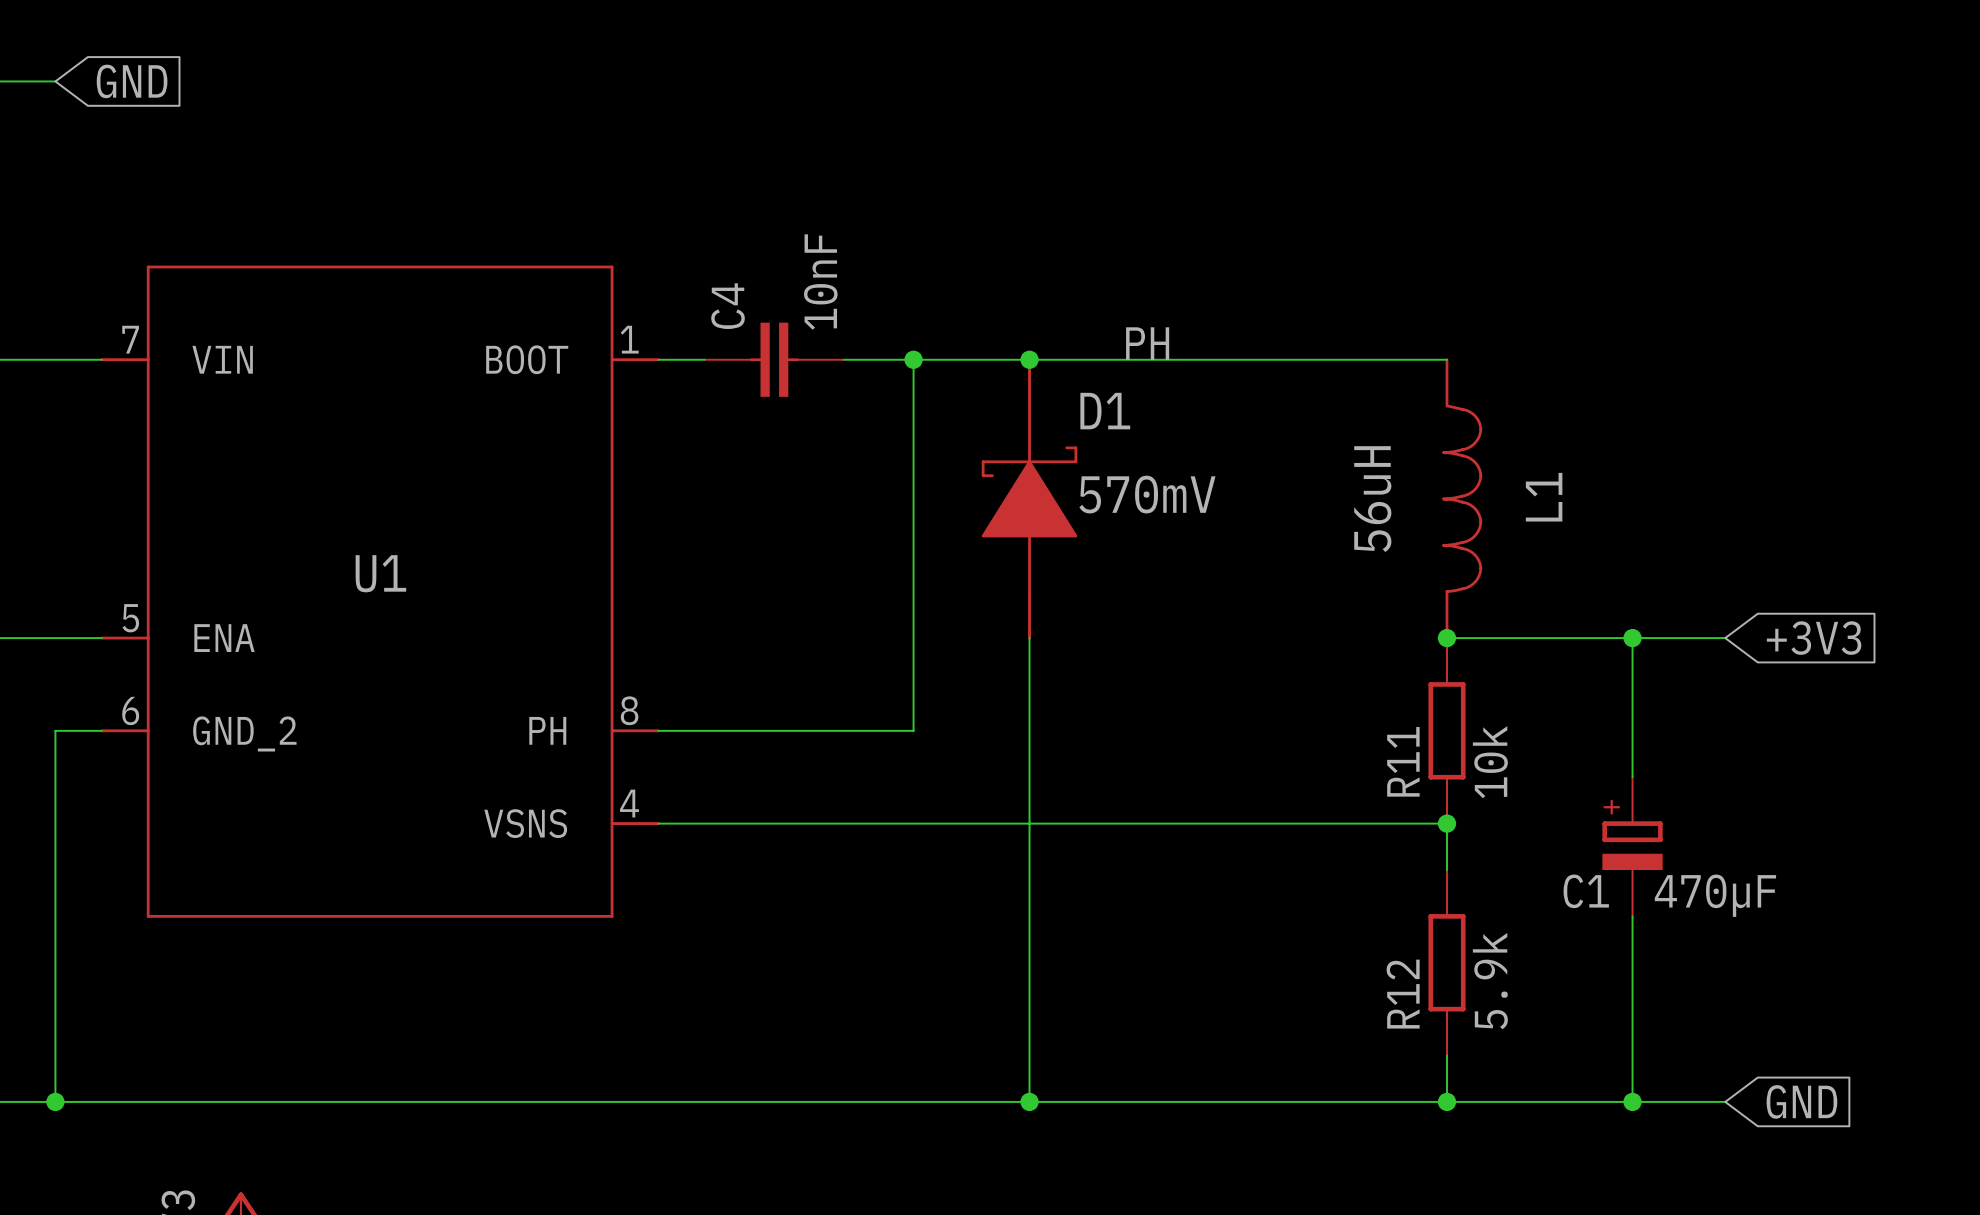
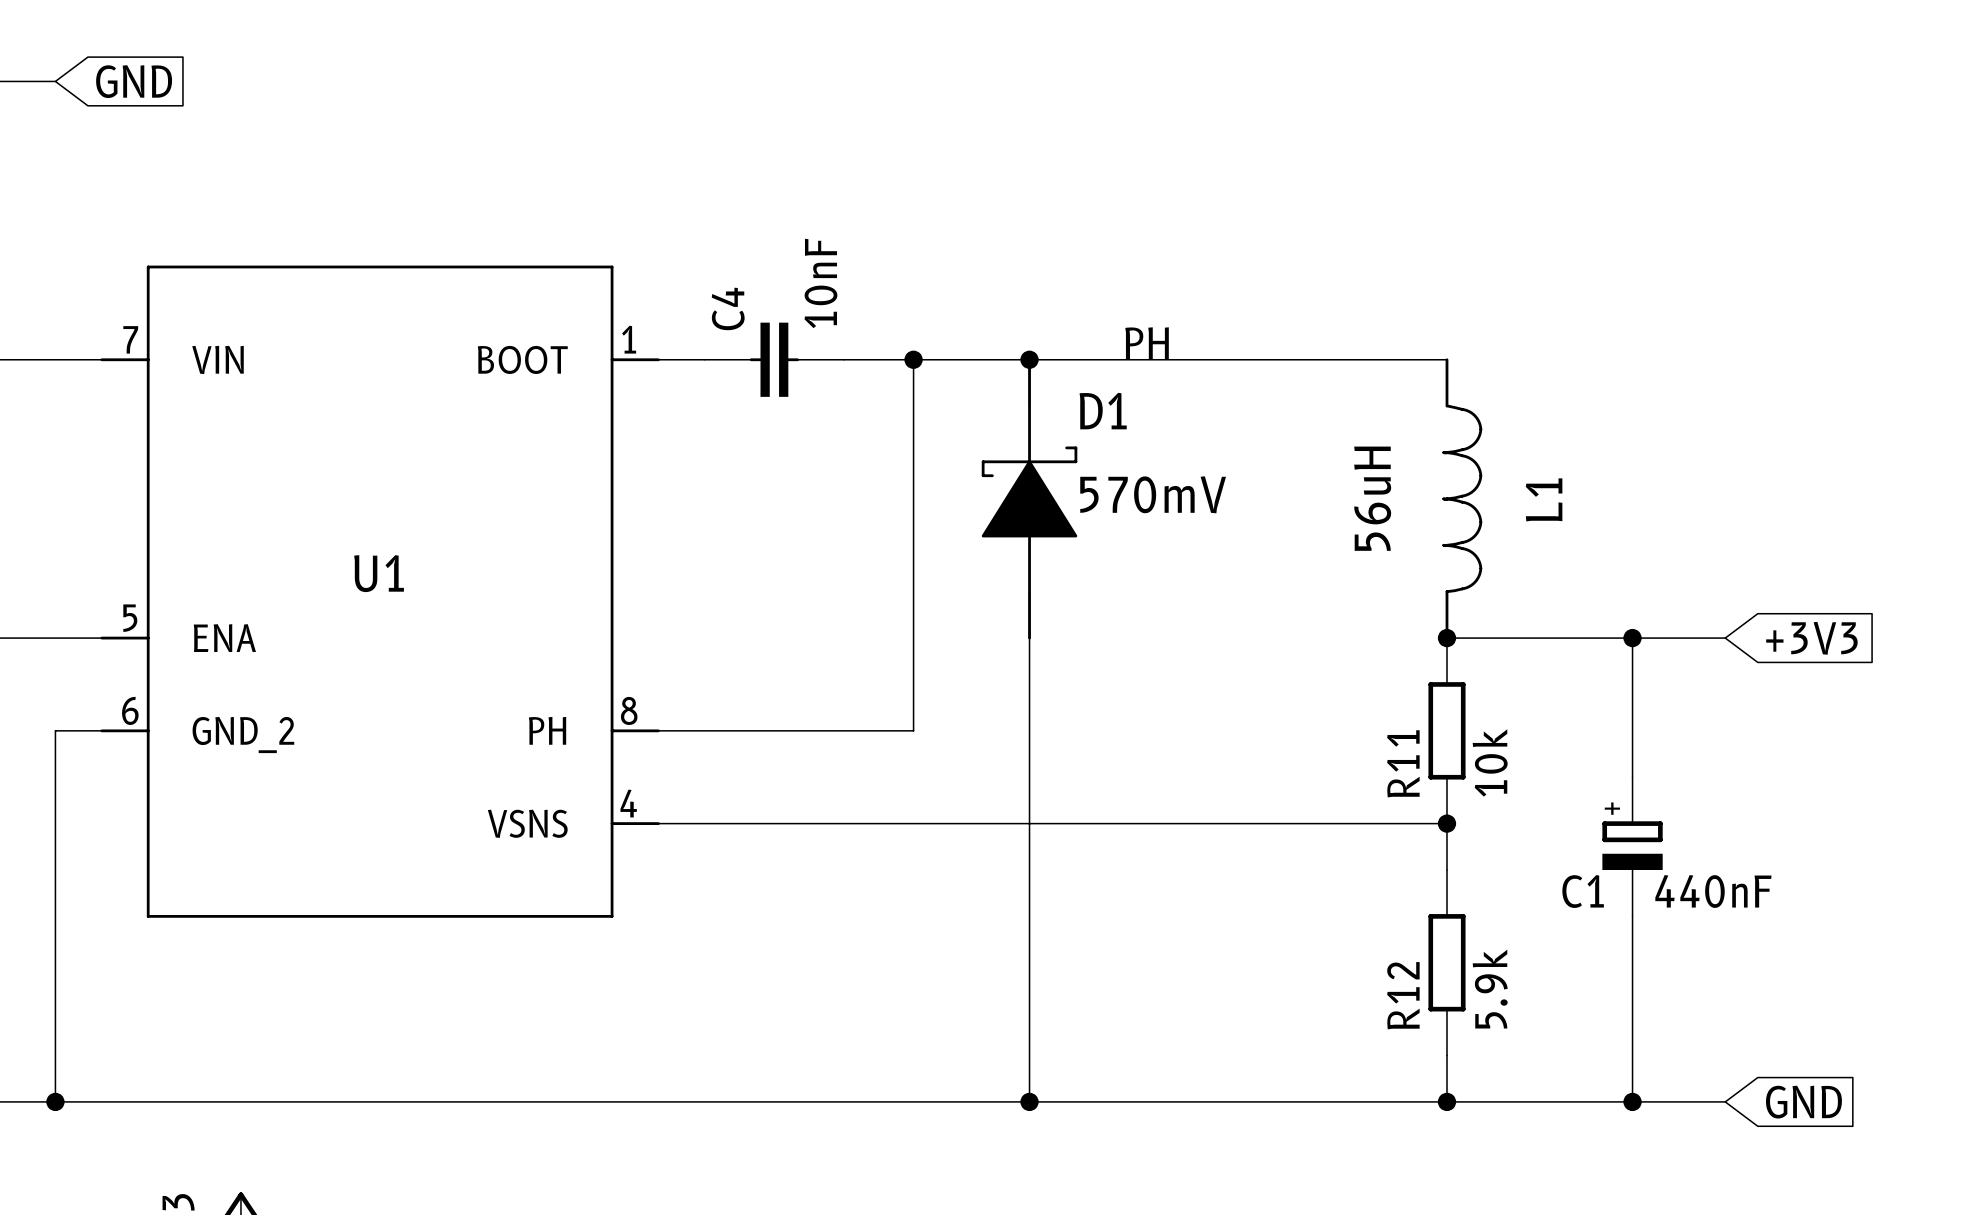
C1 value: 470µF (1715, 895) -> 440nF (1713, 891)

